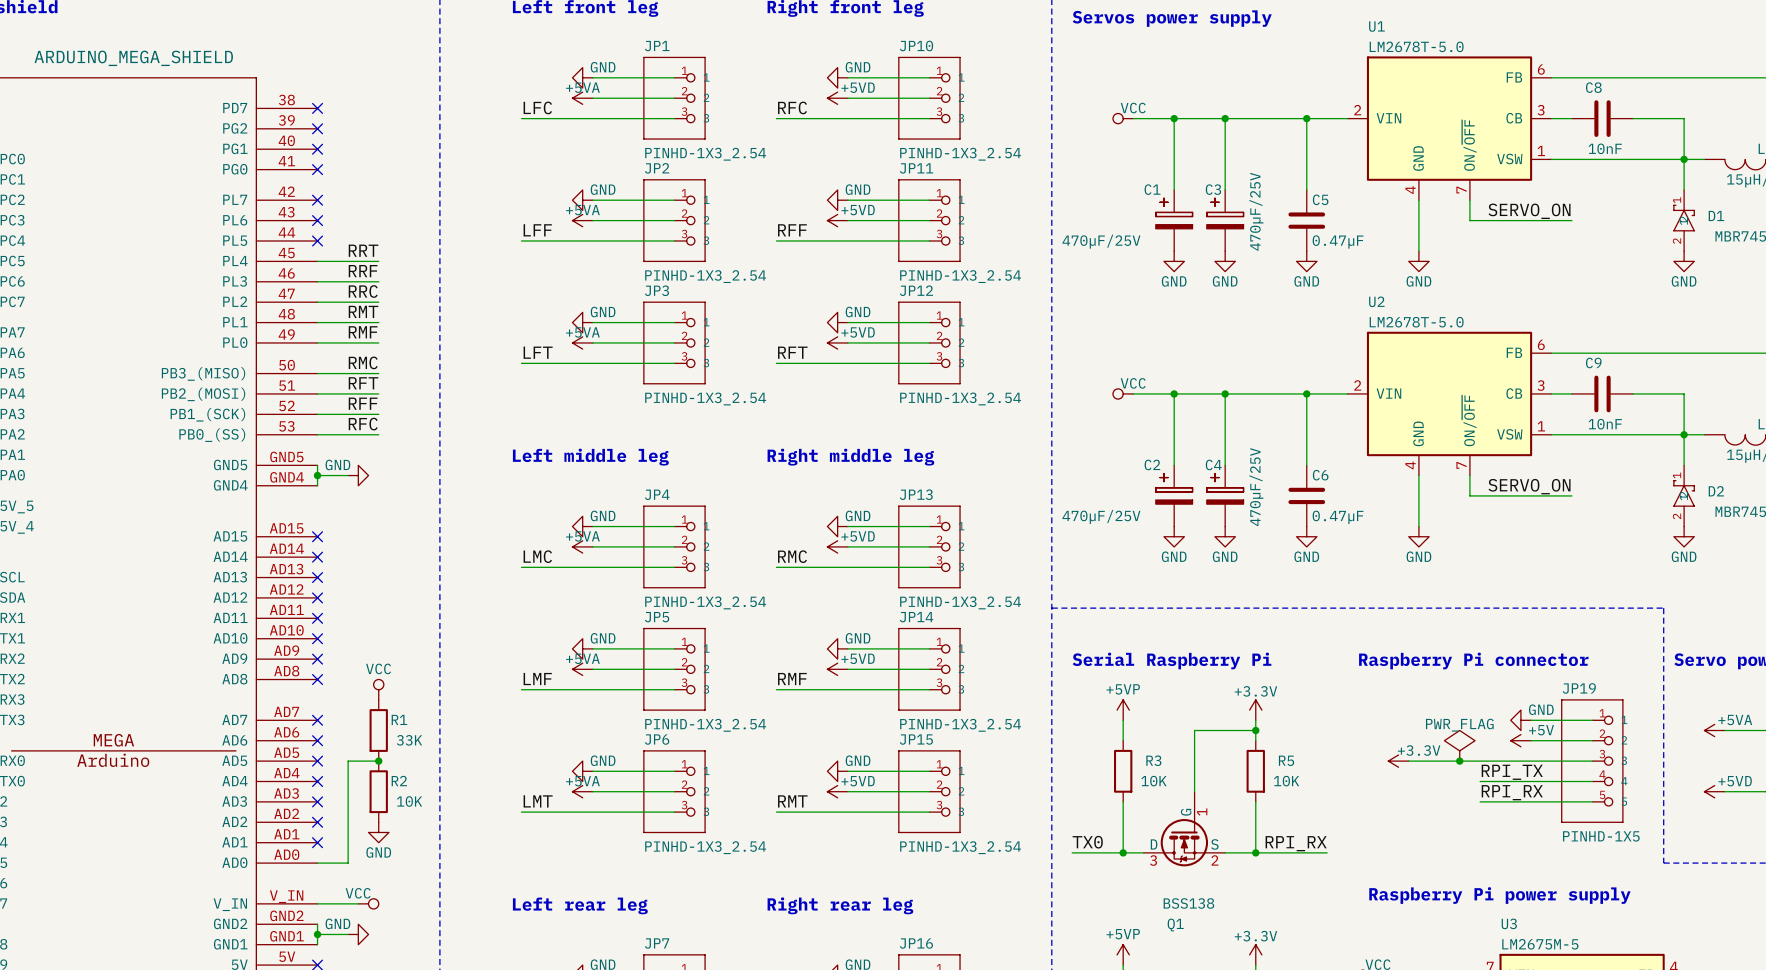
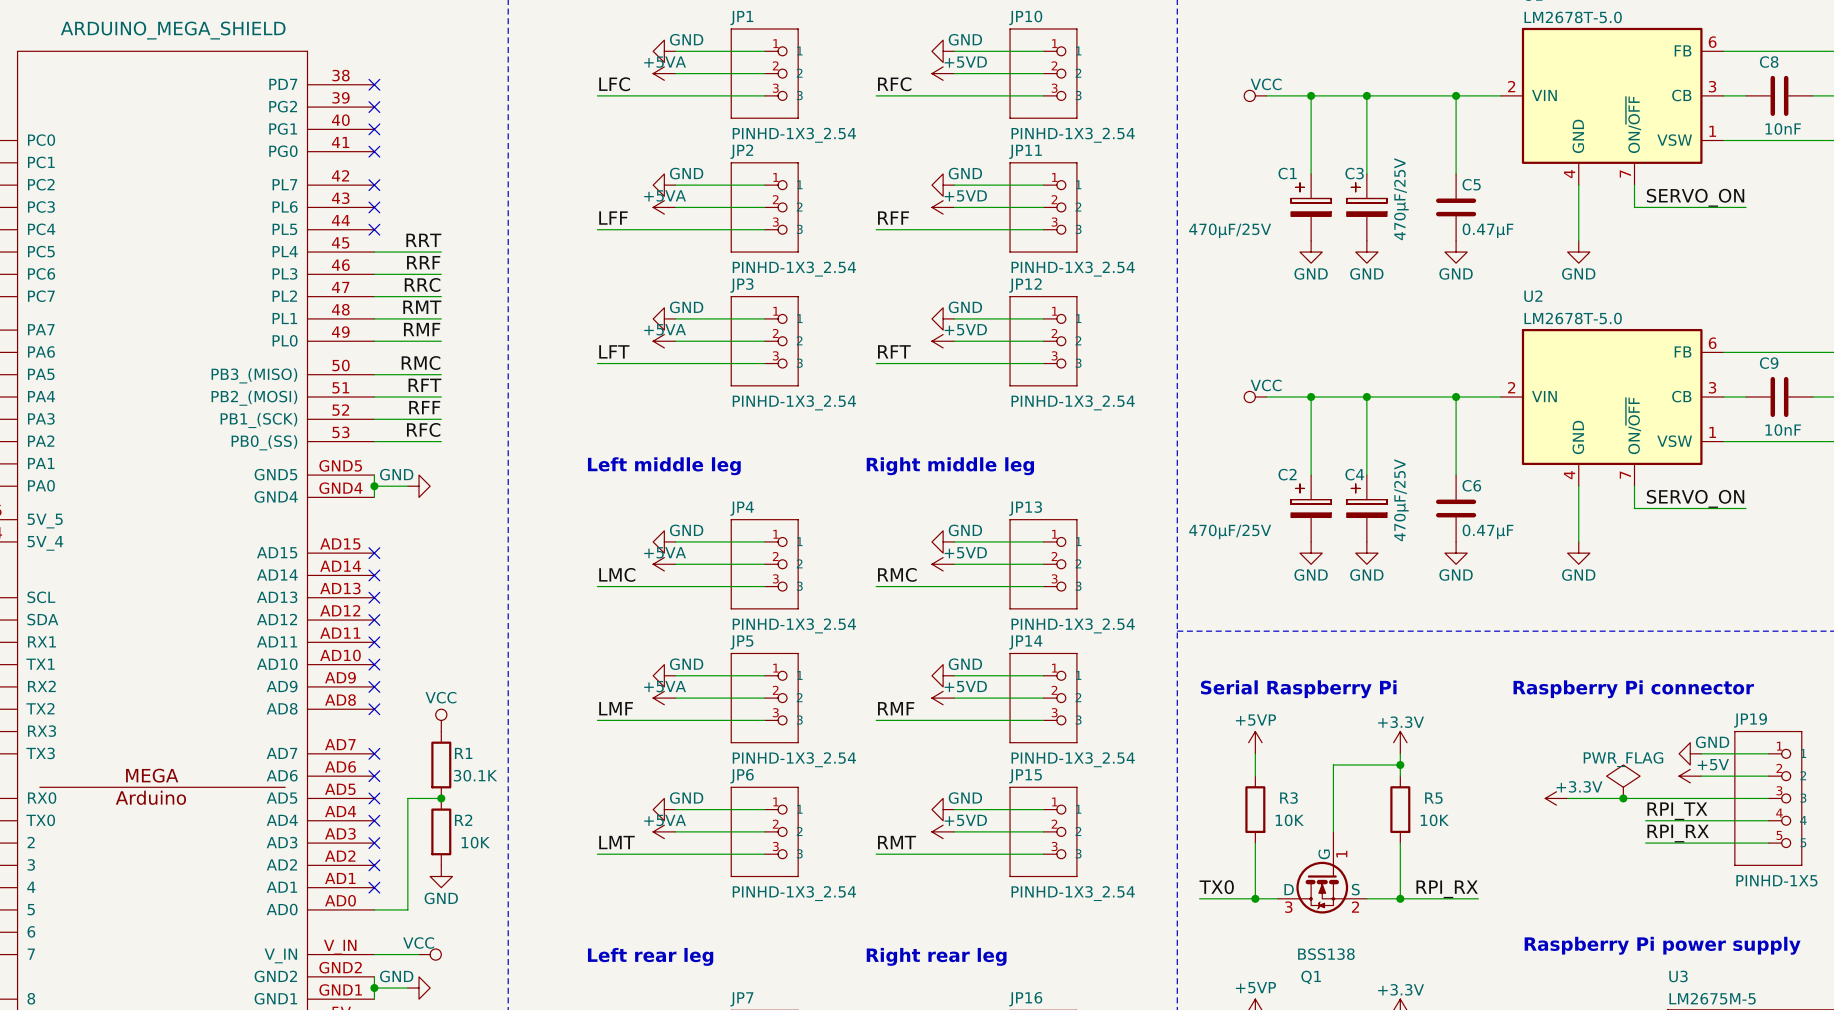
R1 value: 33K (409, 740) -> 30.1K (475, 775)

